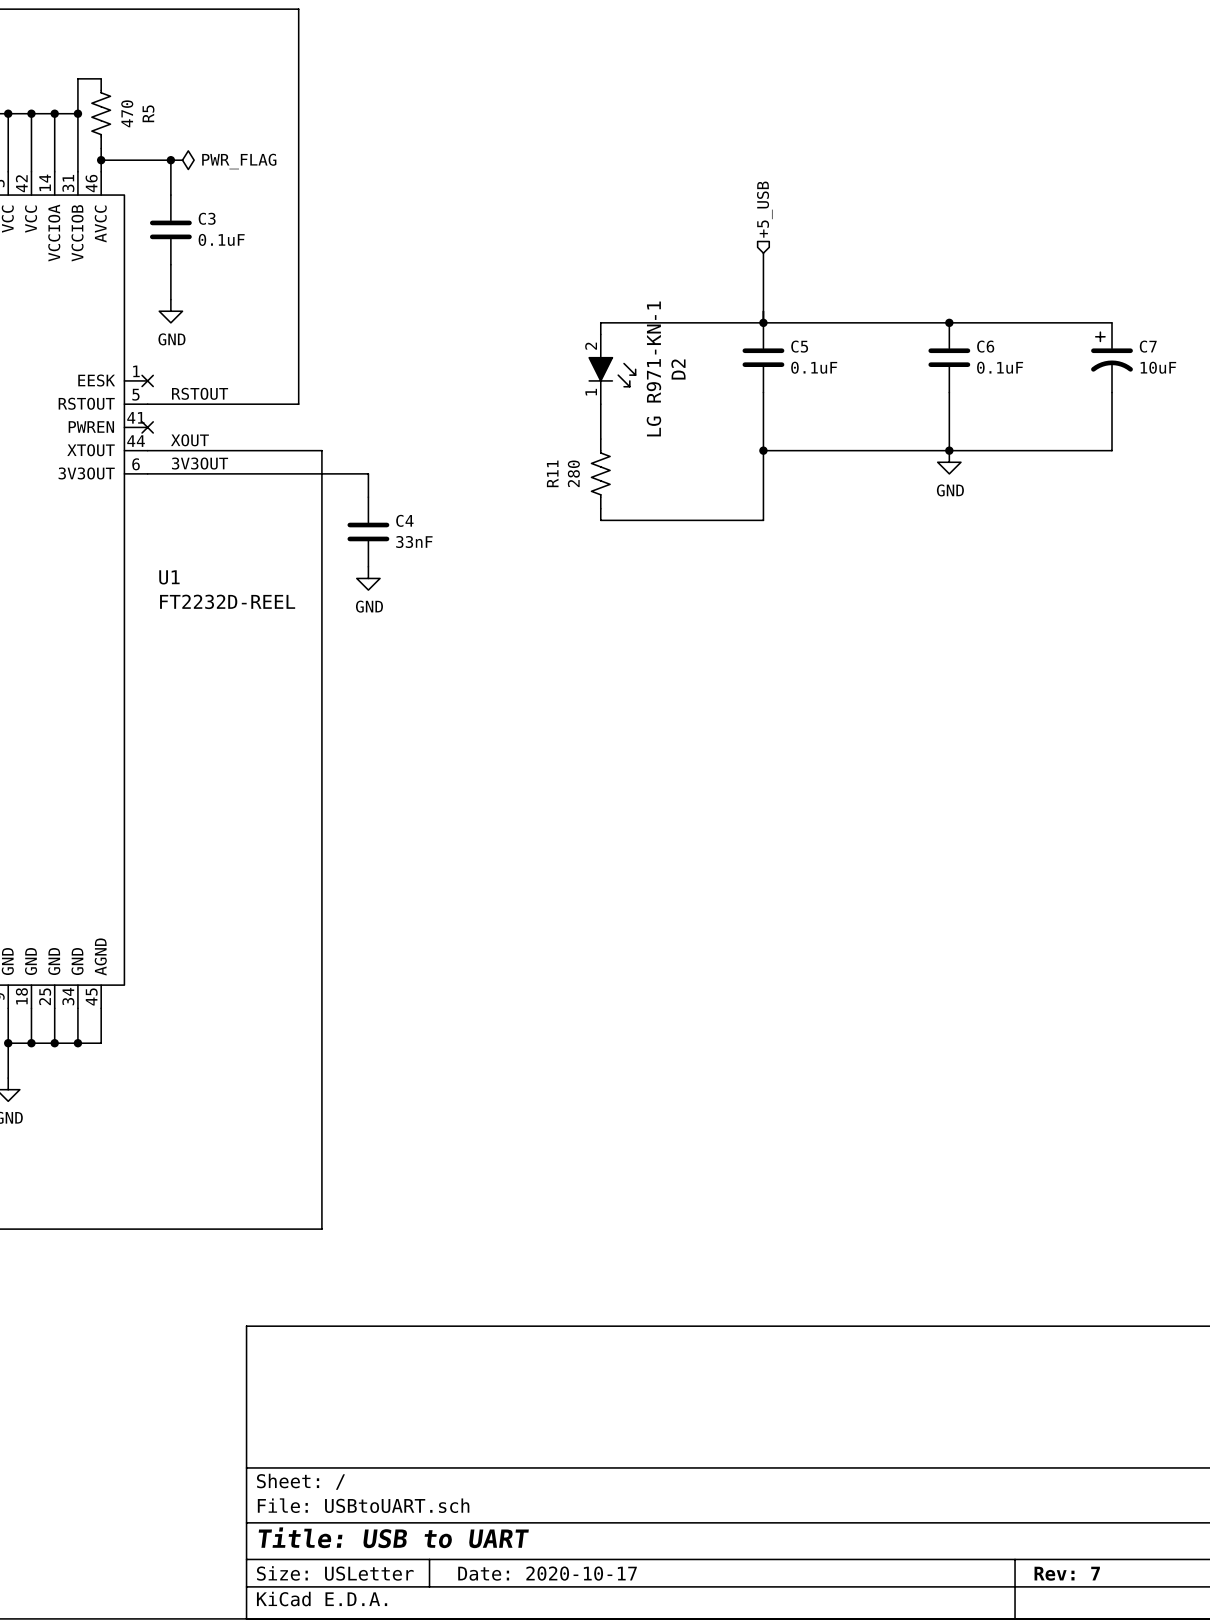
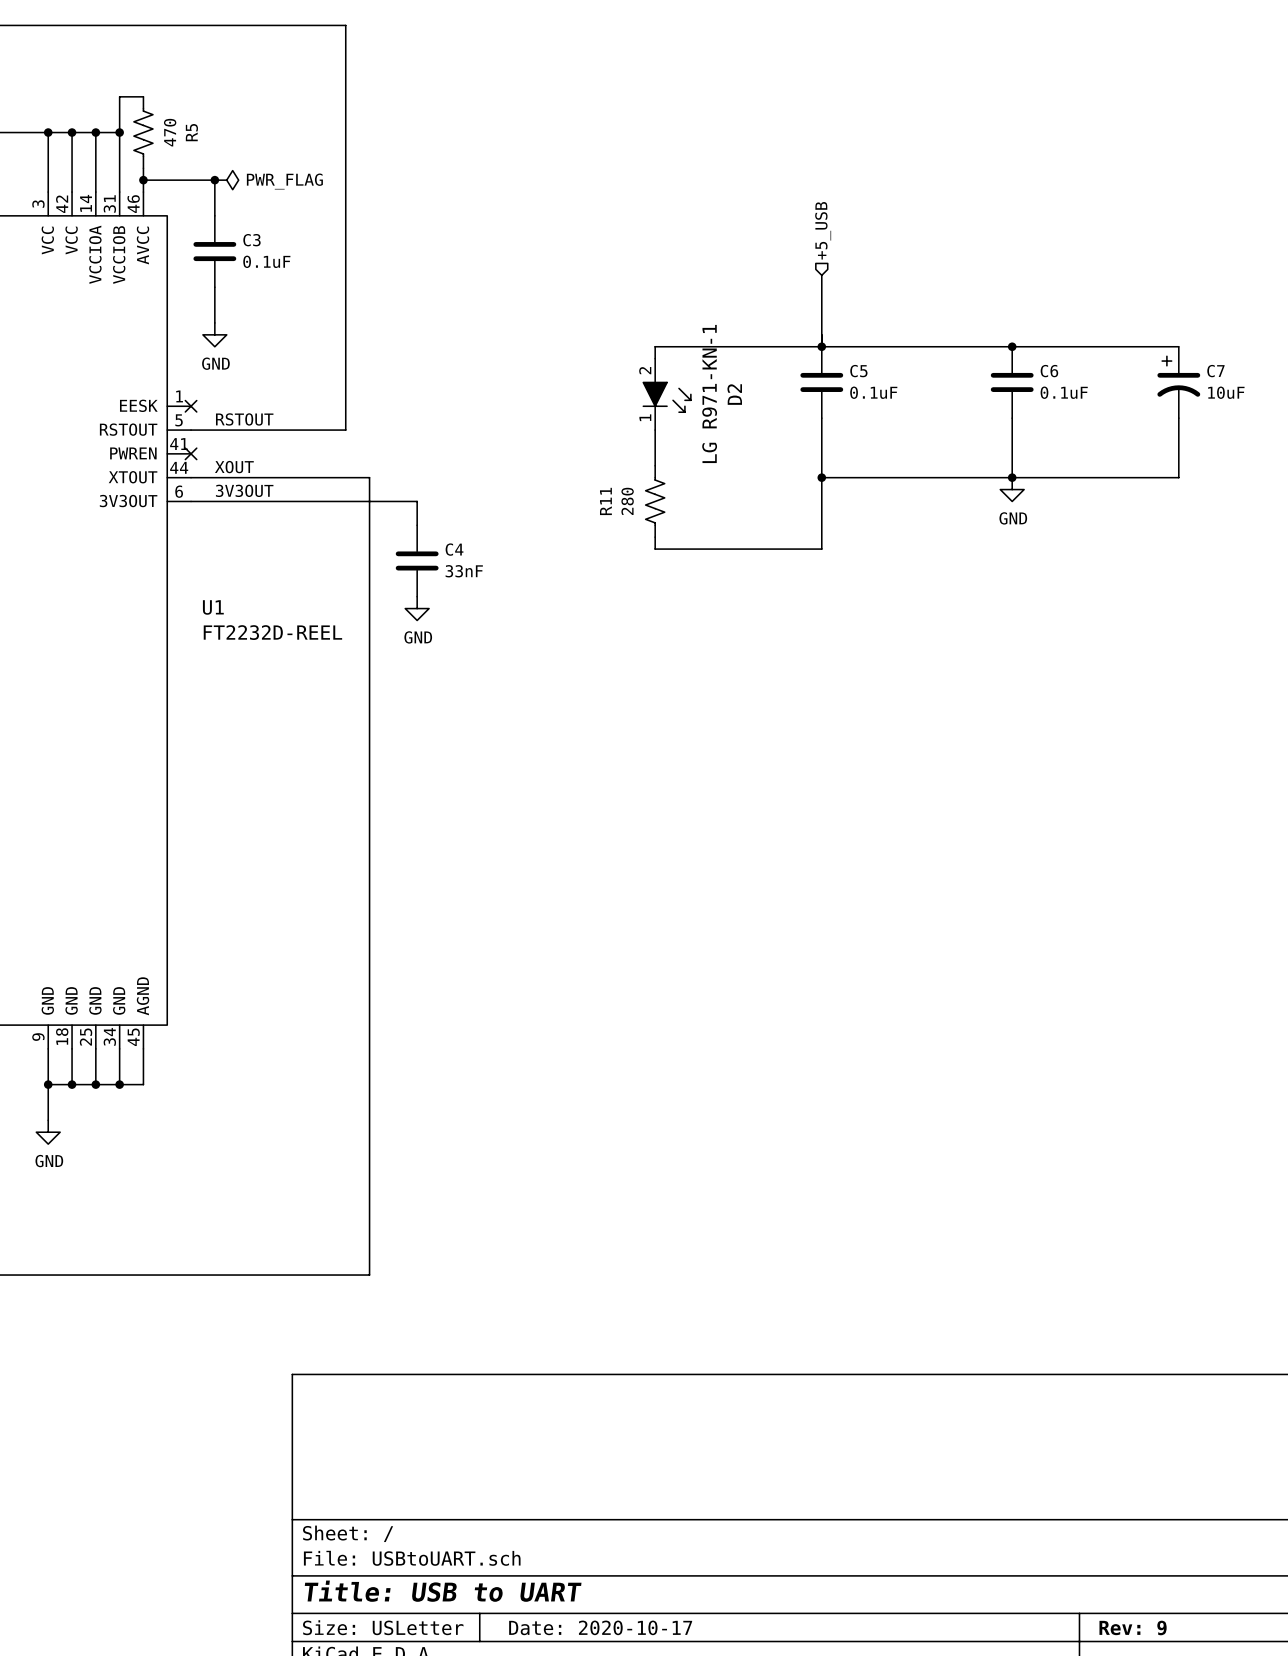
title block: Rev: 7 (1067, 1573) -> Rev: 9 (1133, 1627)

